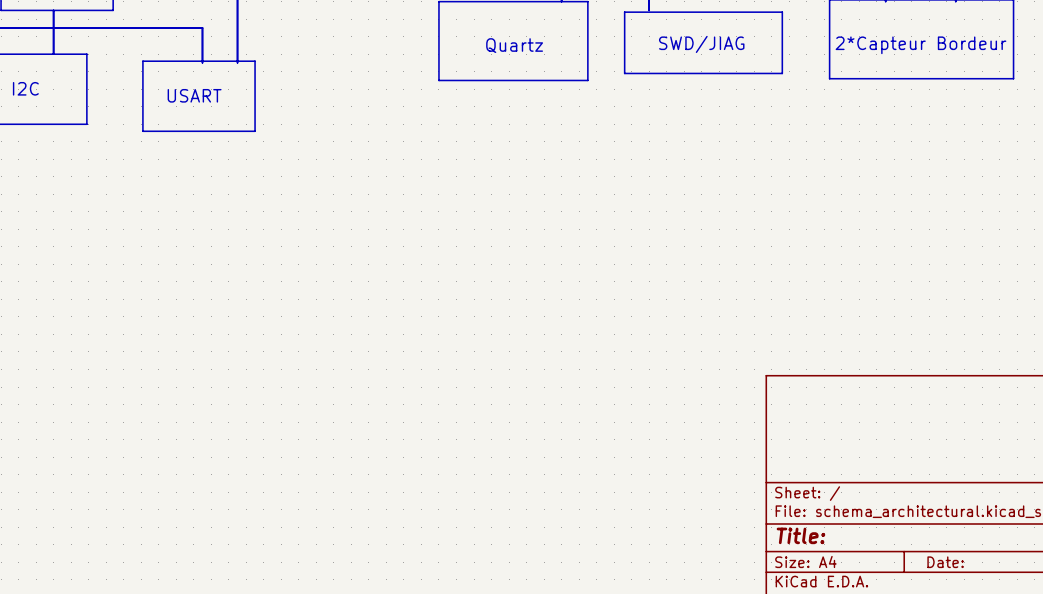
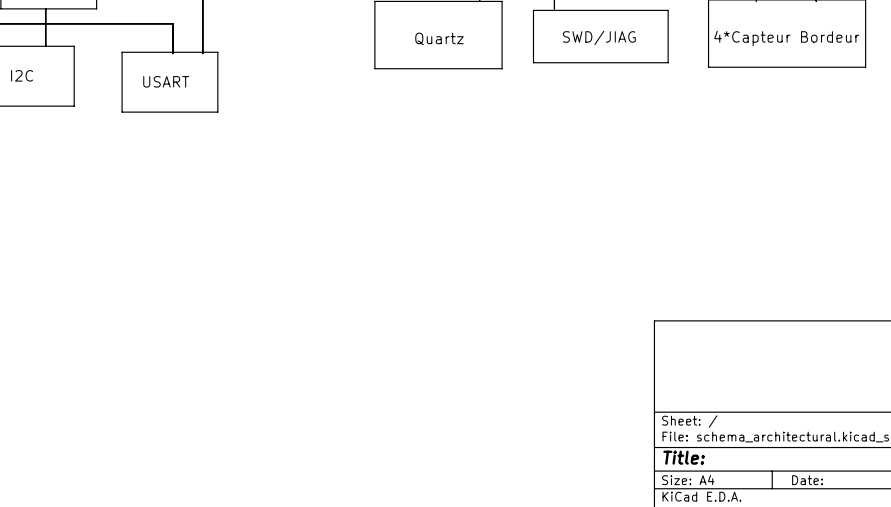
text: 2*Capteur Bordeur (920, 45) -> 4*Capteur Bordeur (786, 38)

